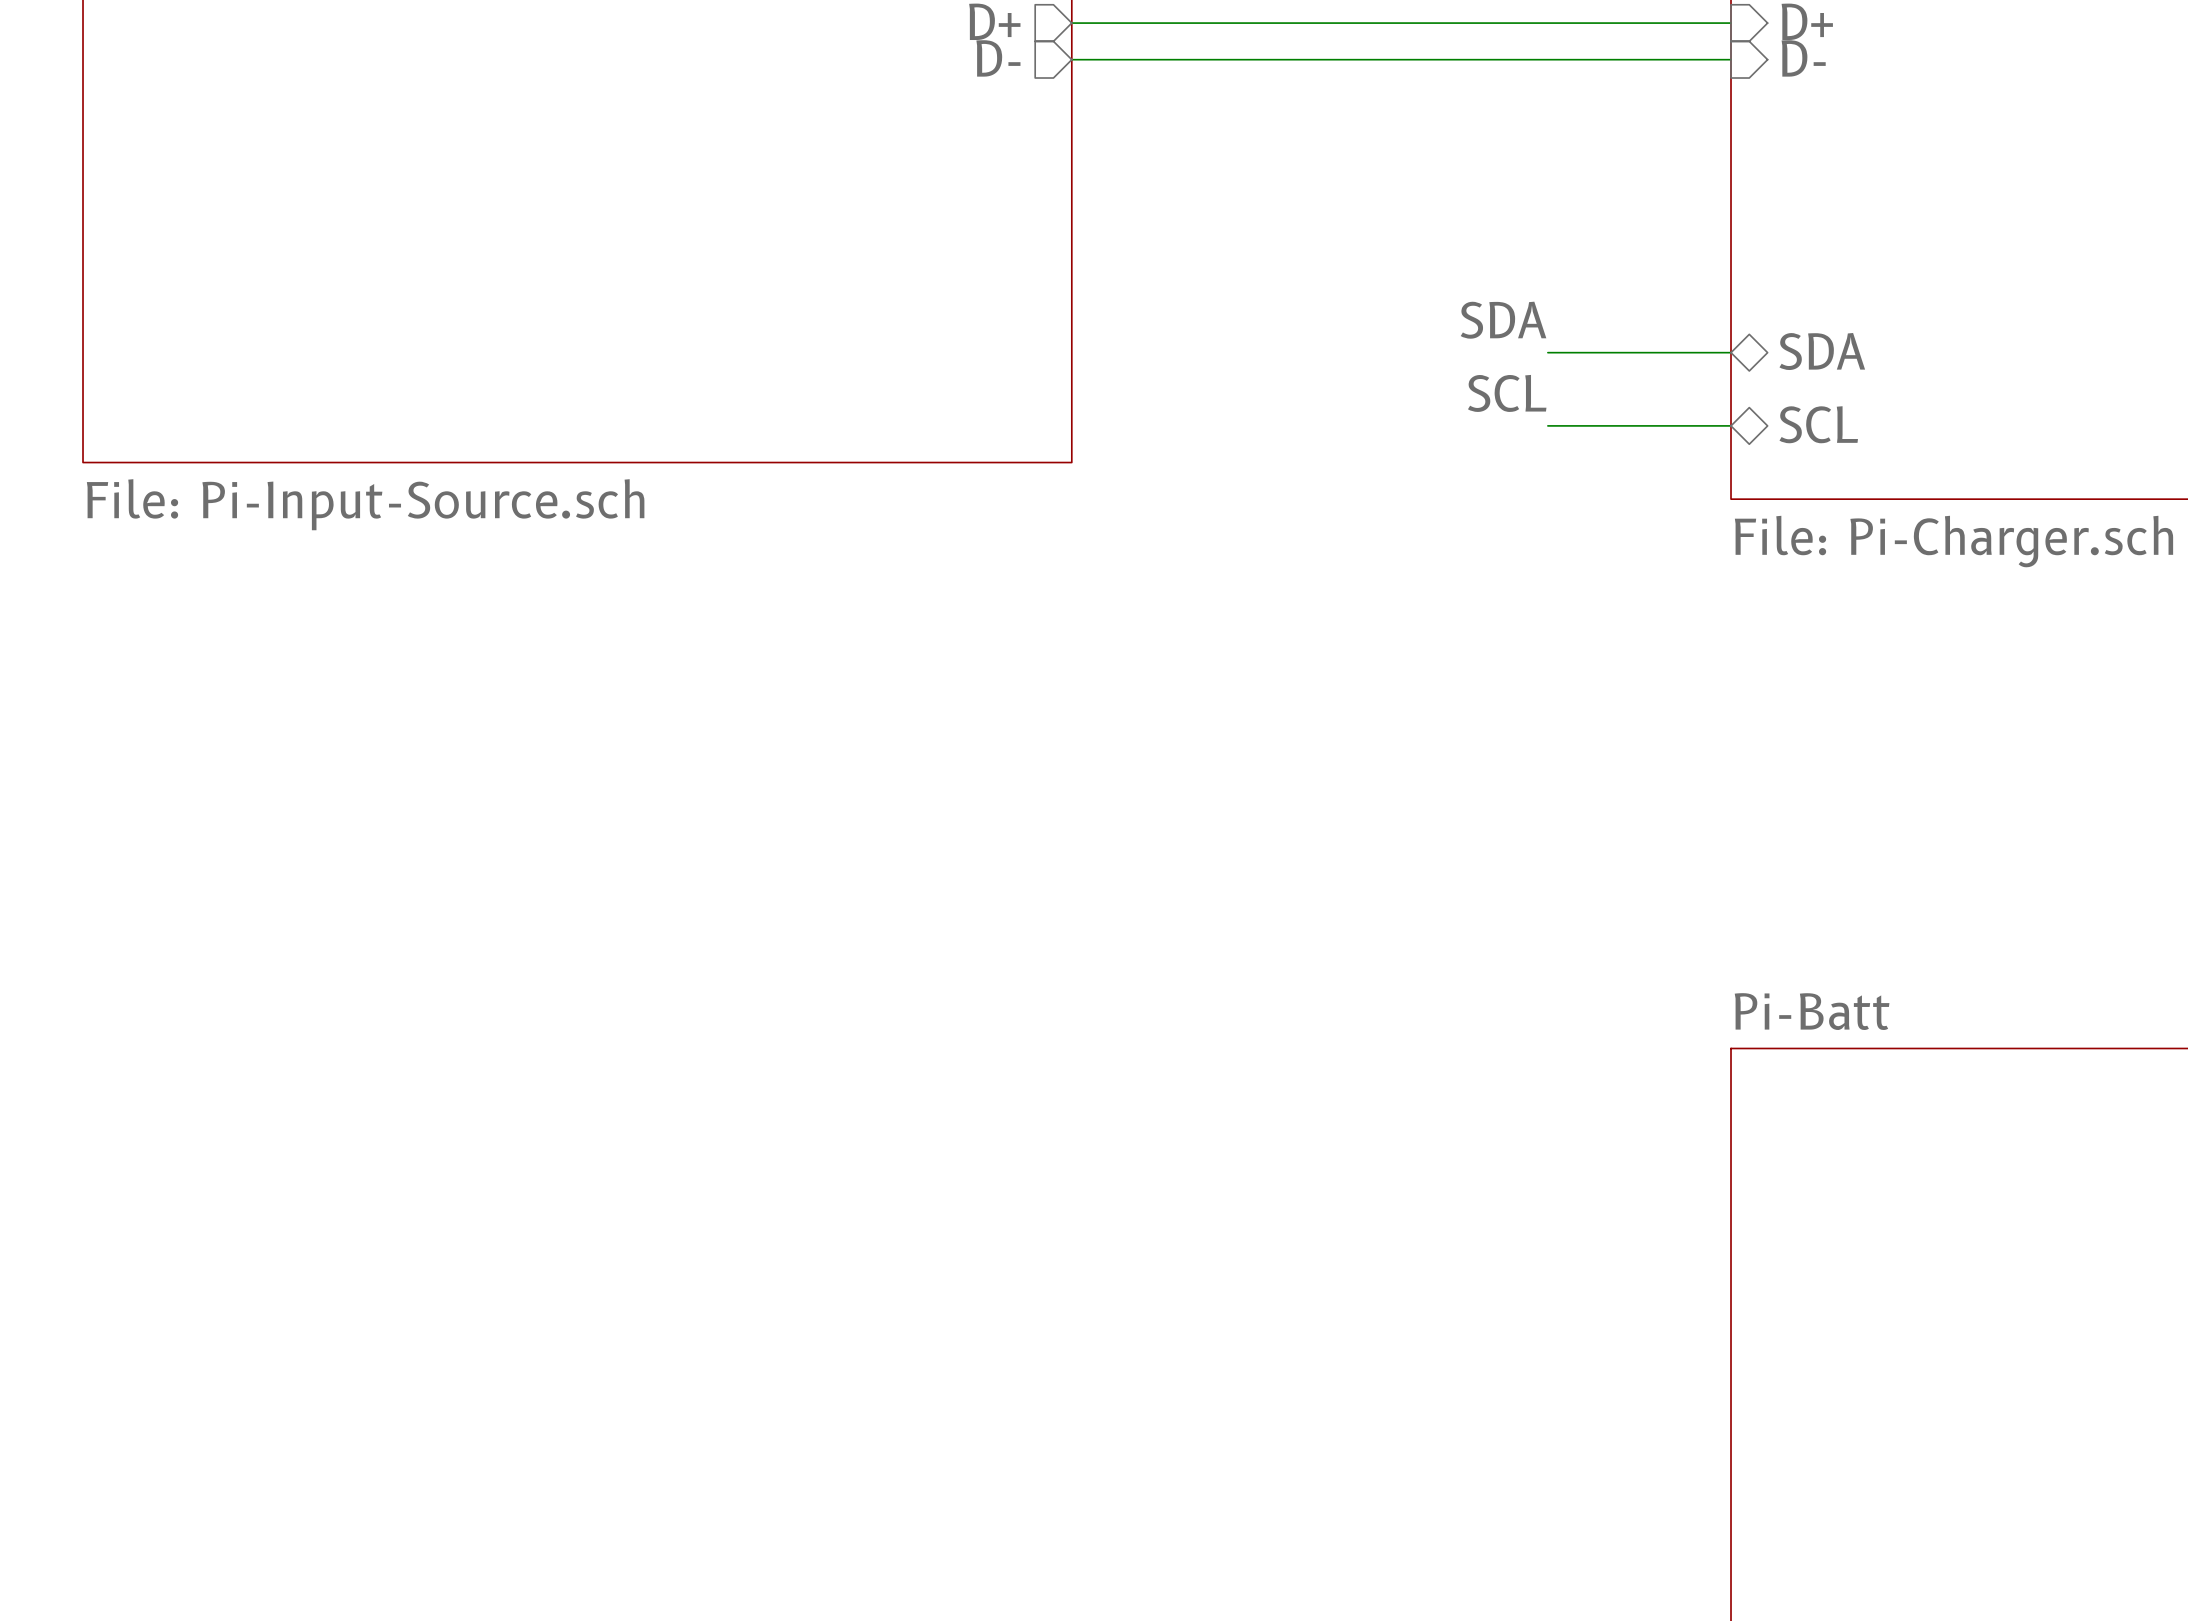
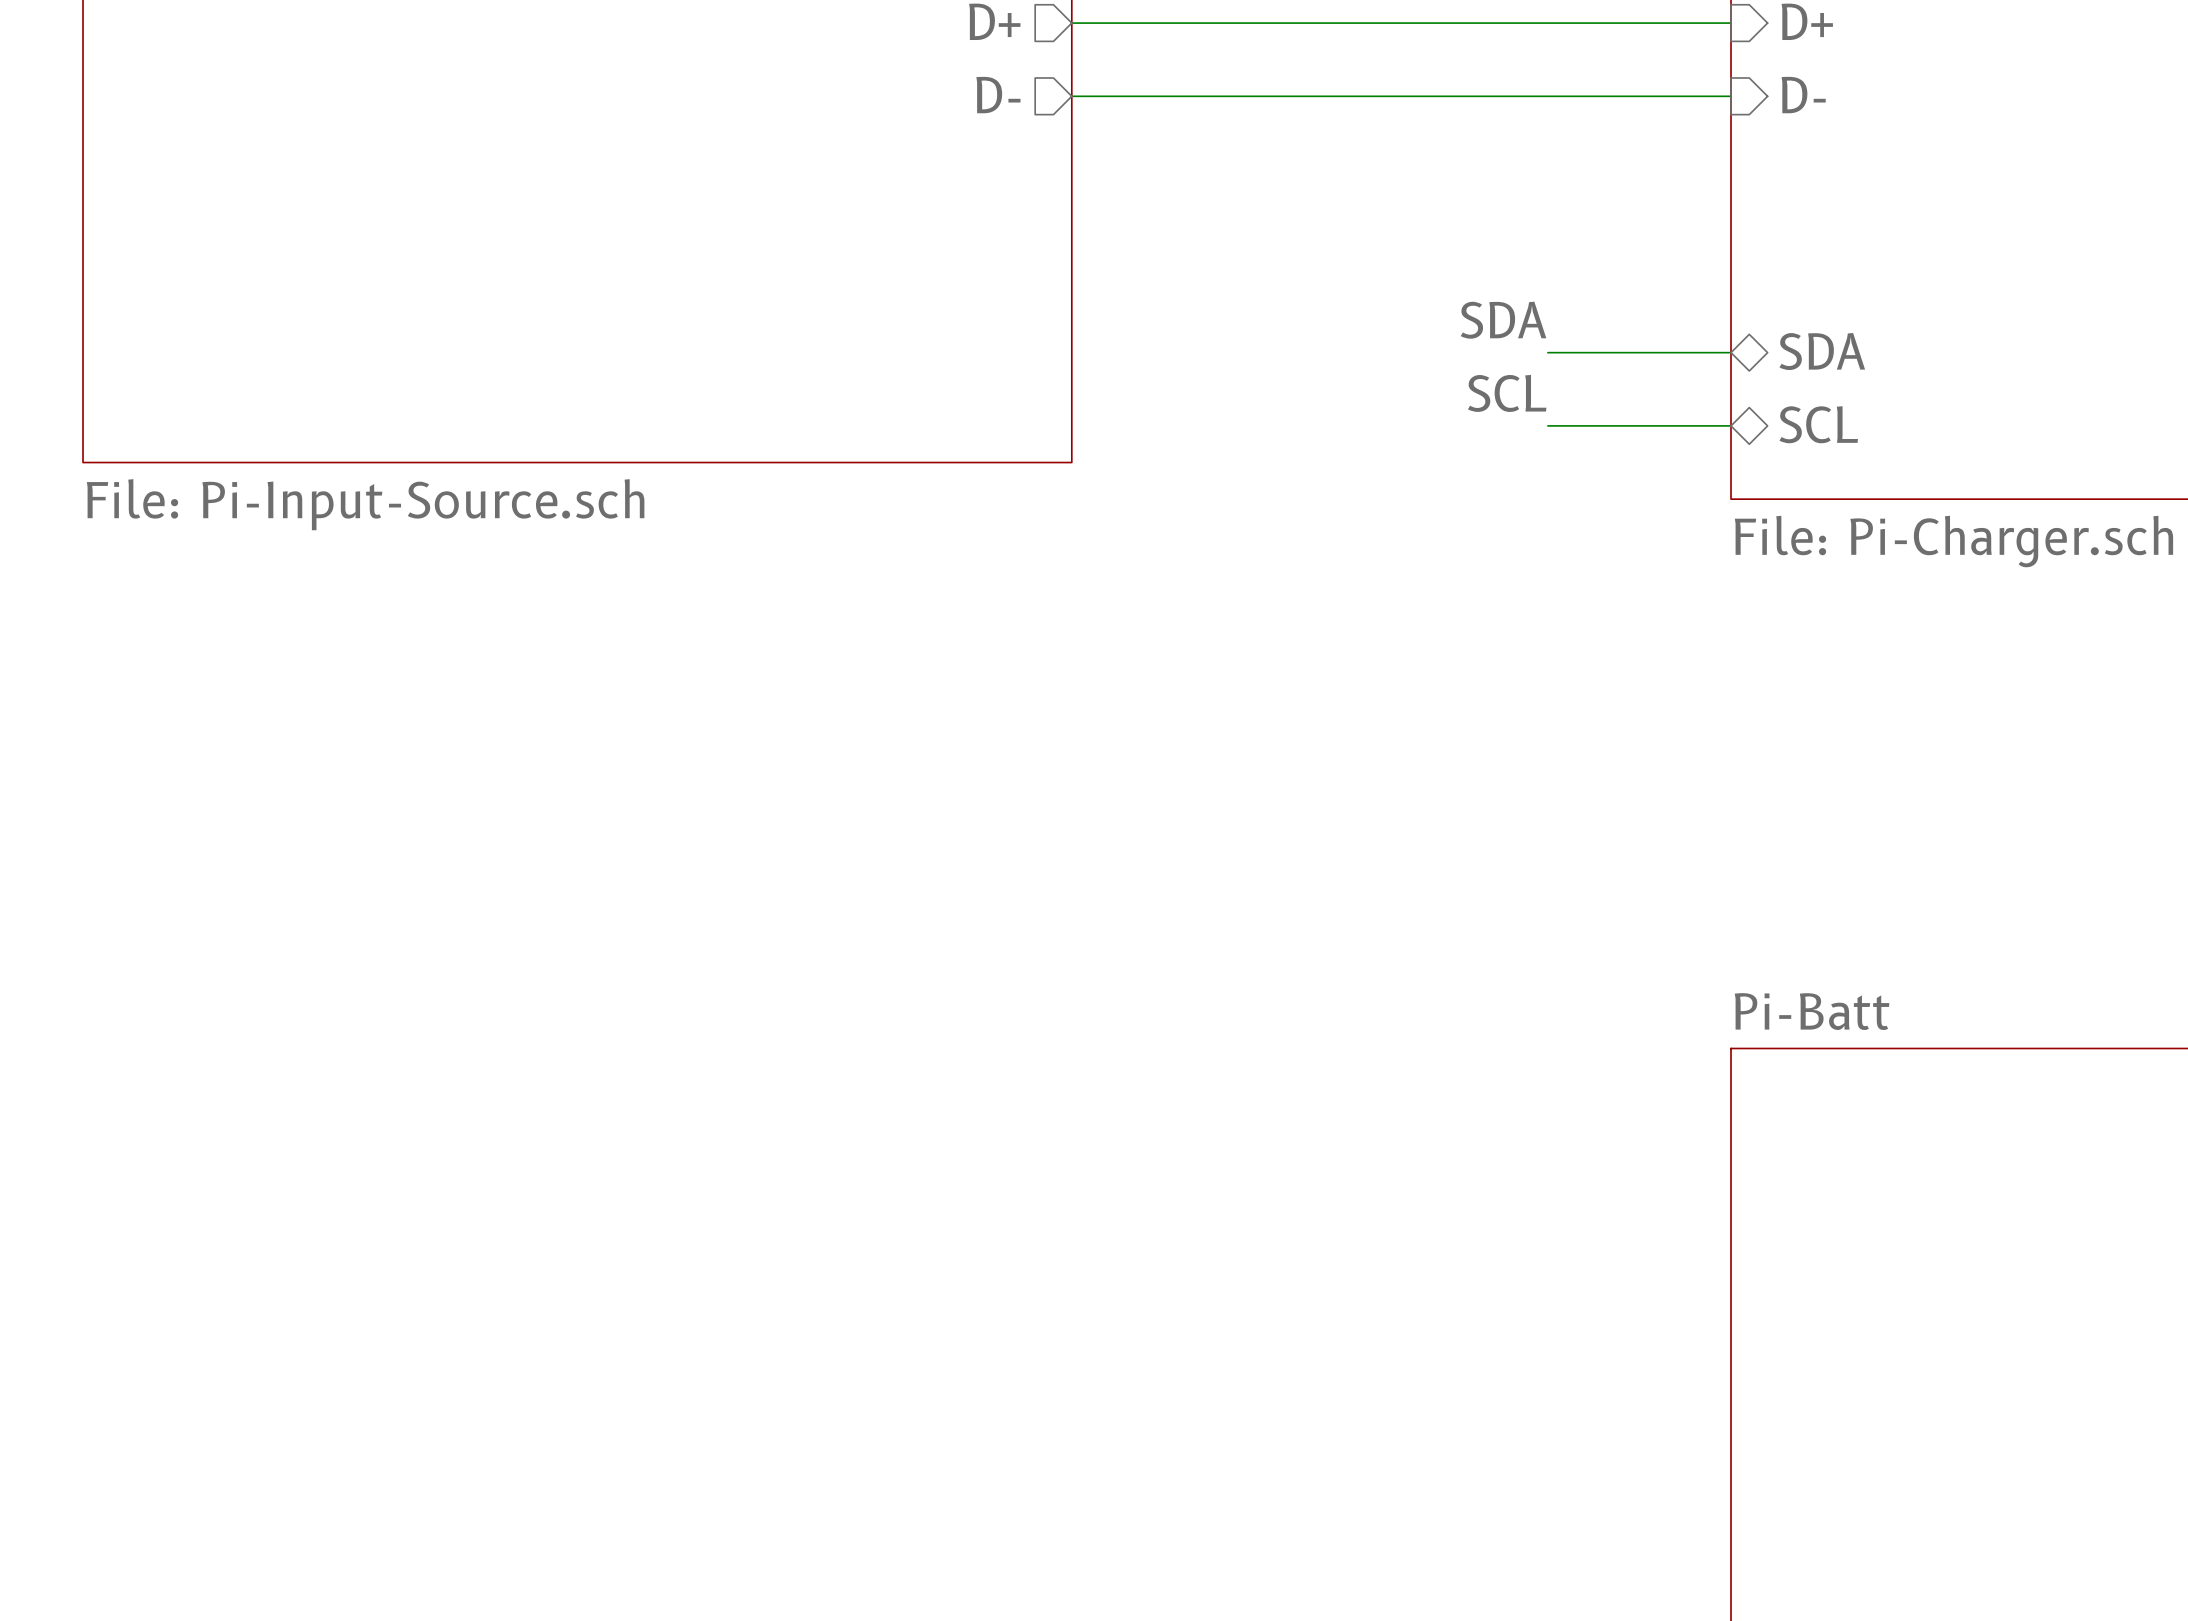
sheet pin position: D- (998, 58) -> D- (998, 95)
sheet pin position: D- (1803, 58) -> D- (1803, 95)
wire: (1071, 59) (1731, 59) -> (1071, 96) (1731, 96)

